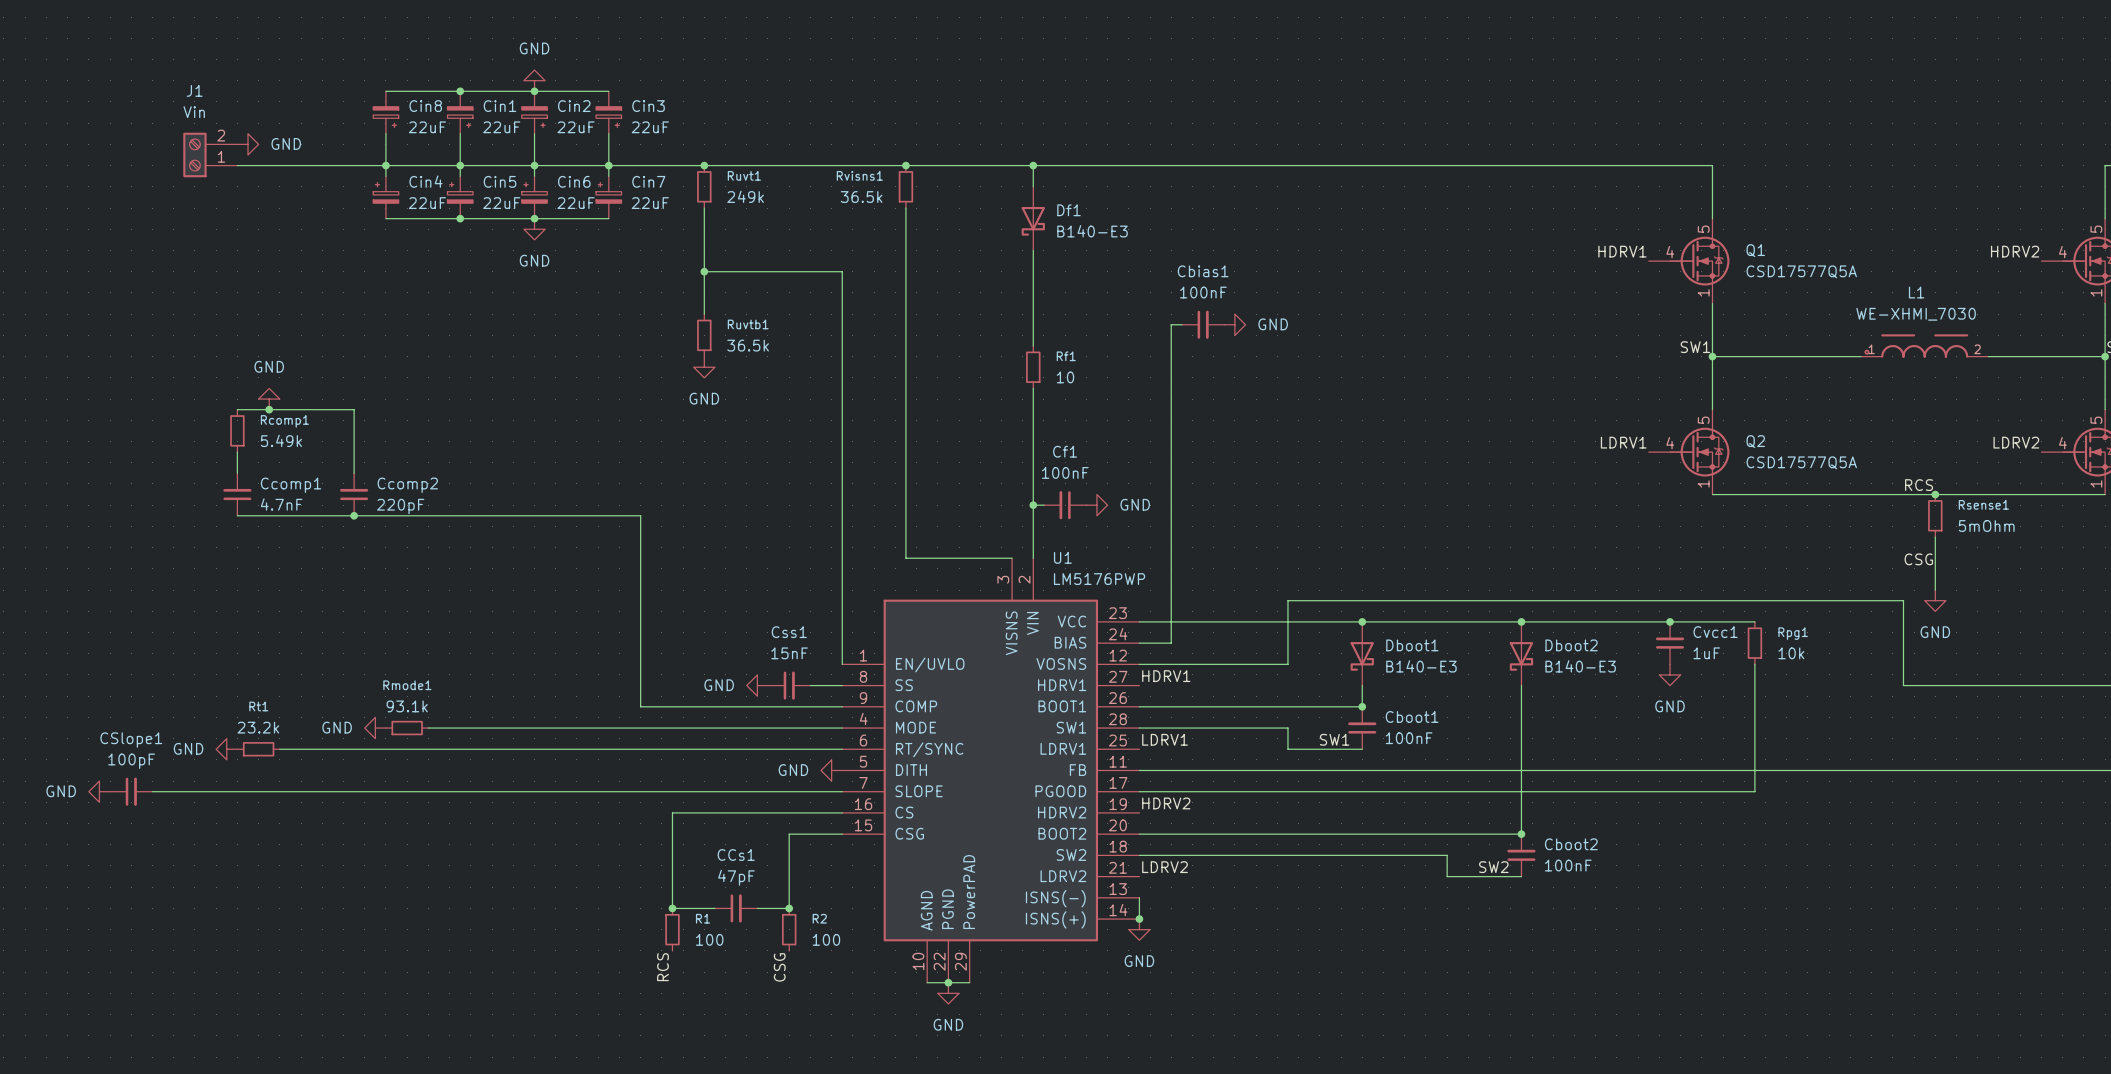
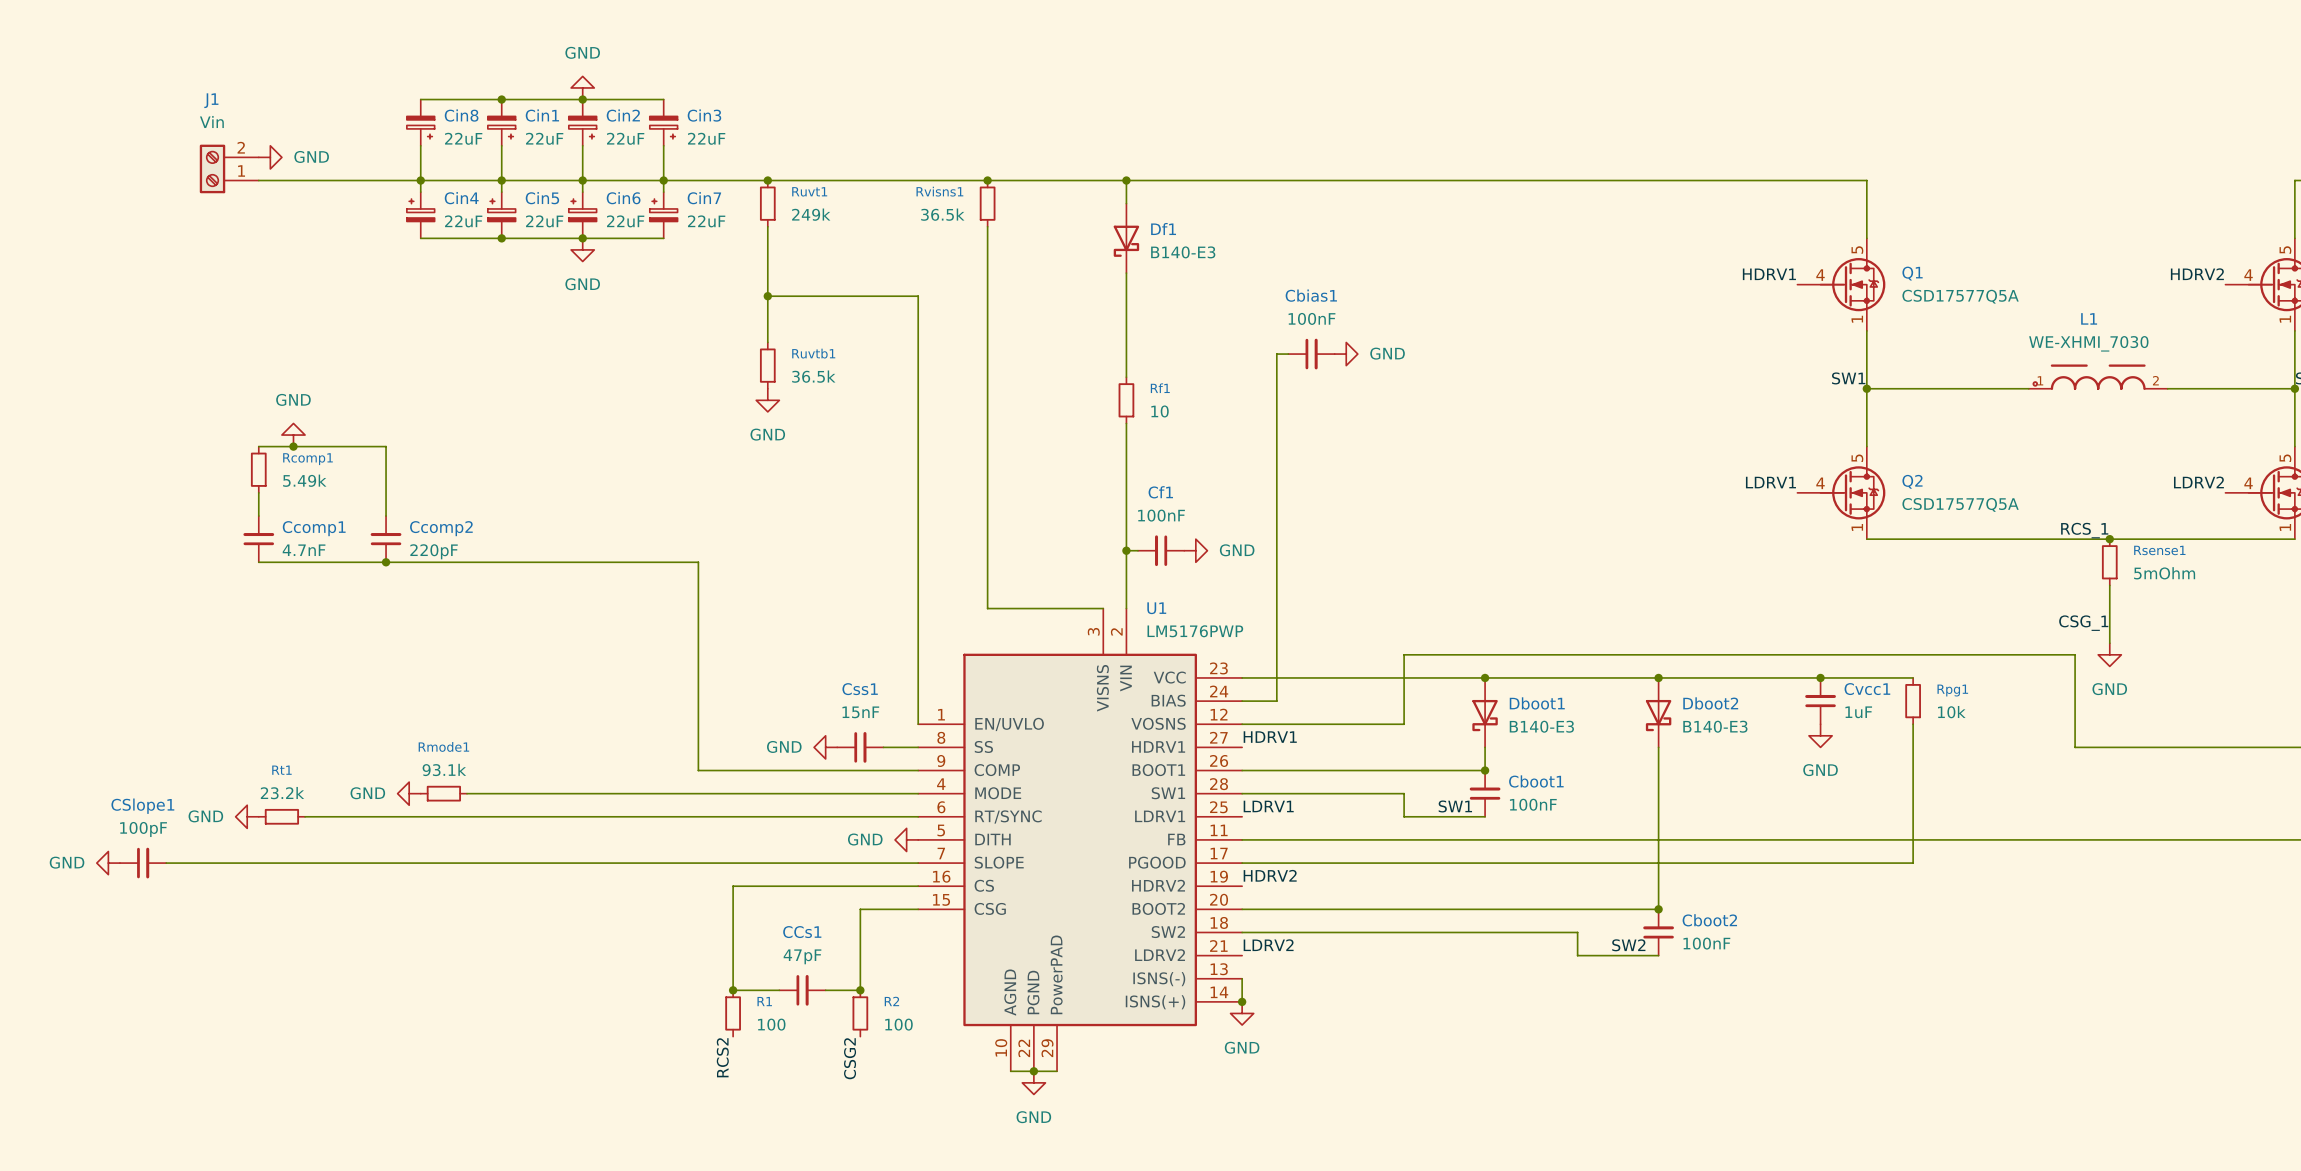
label: RCS (1919, 485) -> RCS_1 (2084, 530)
label: CSG (1918, 559) -> CSG_1 (2083, 623)
label: RCS (663, 967) -> RCS2 (722, 1057)
label: CSG (779, 967) -> CSG2 (850, 1058)

